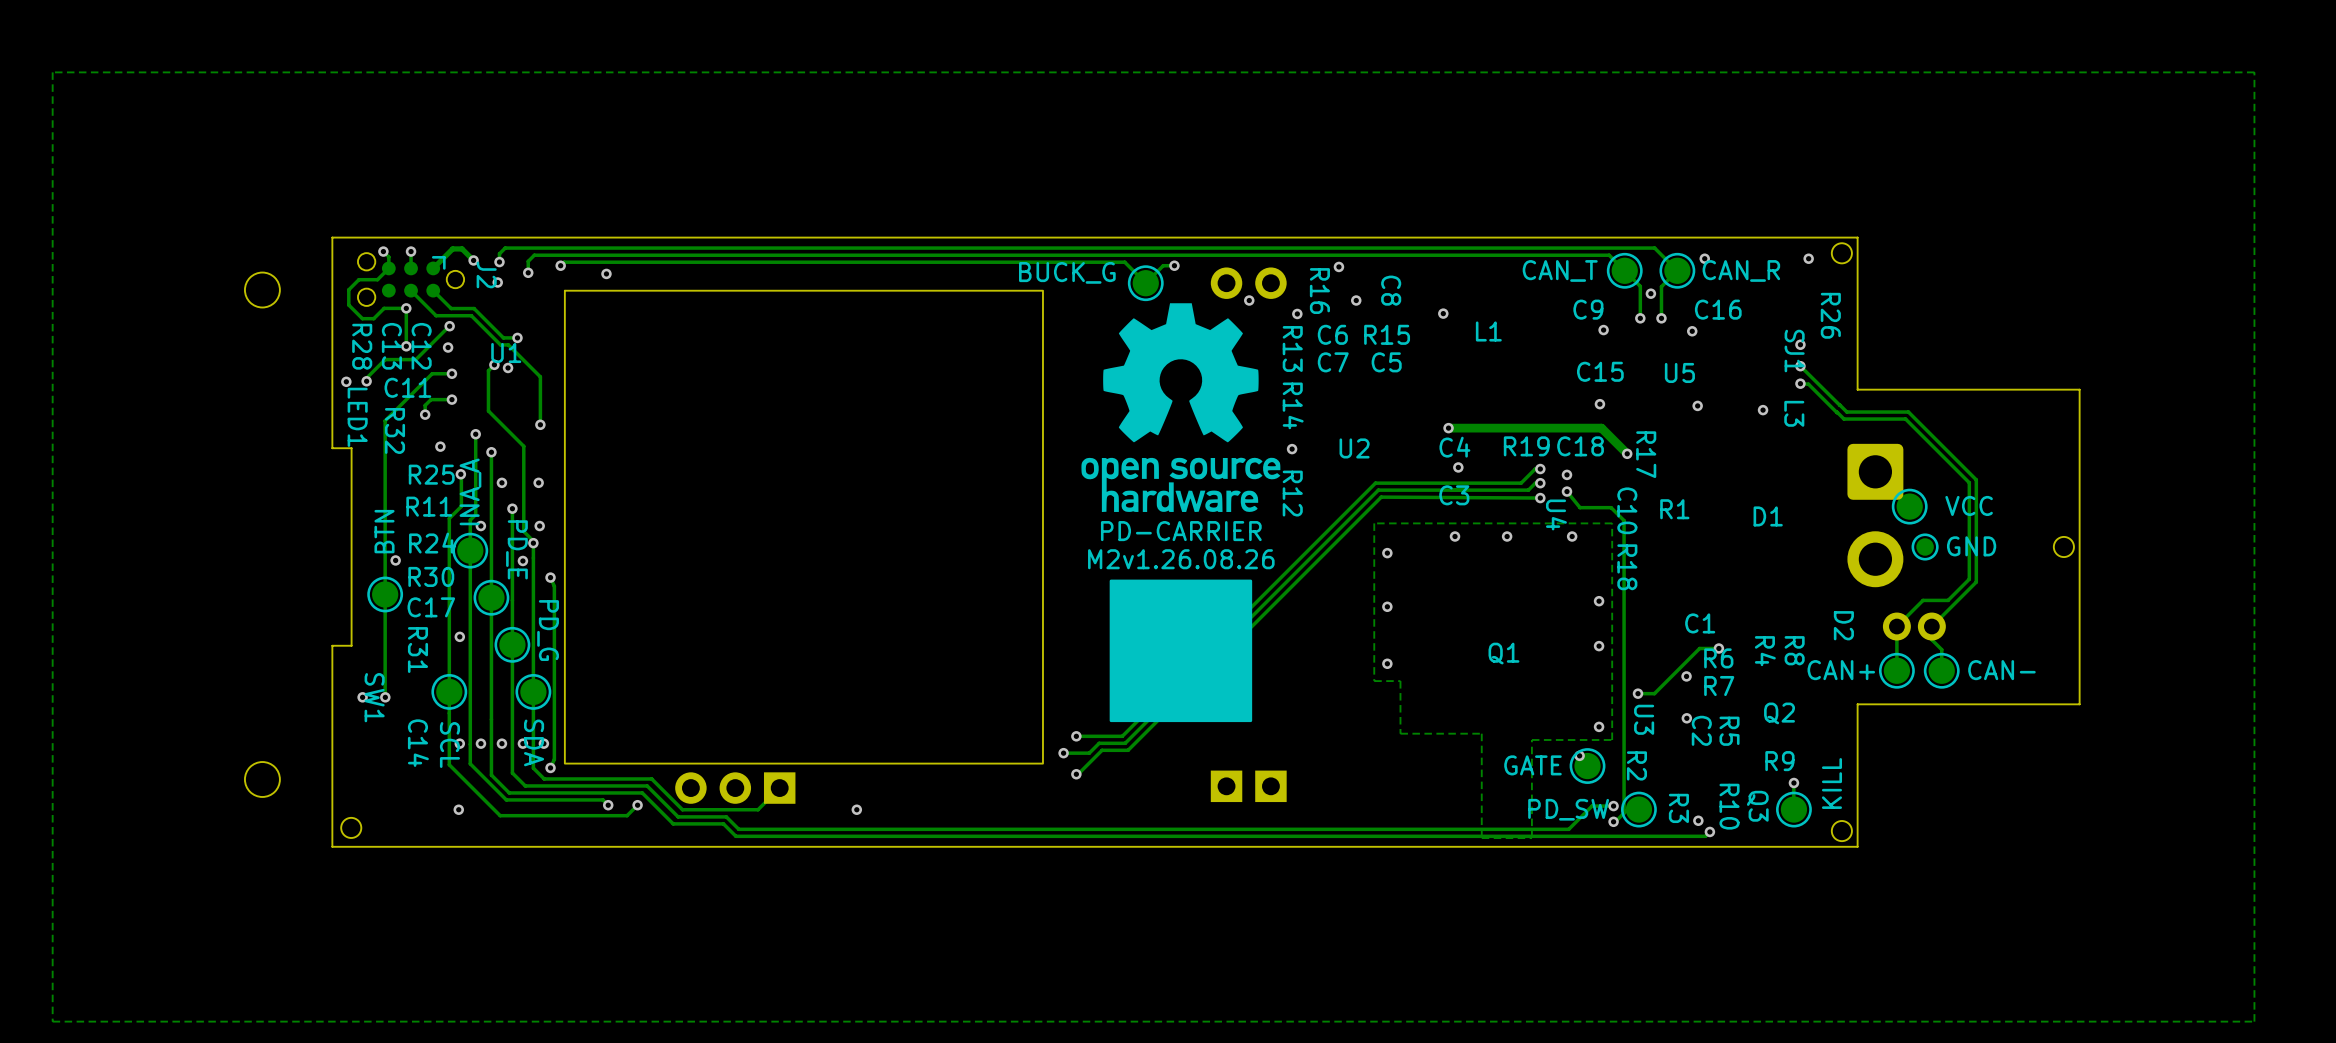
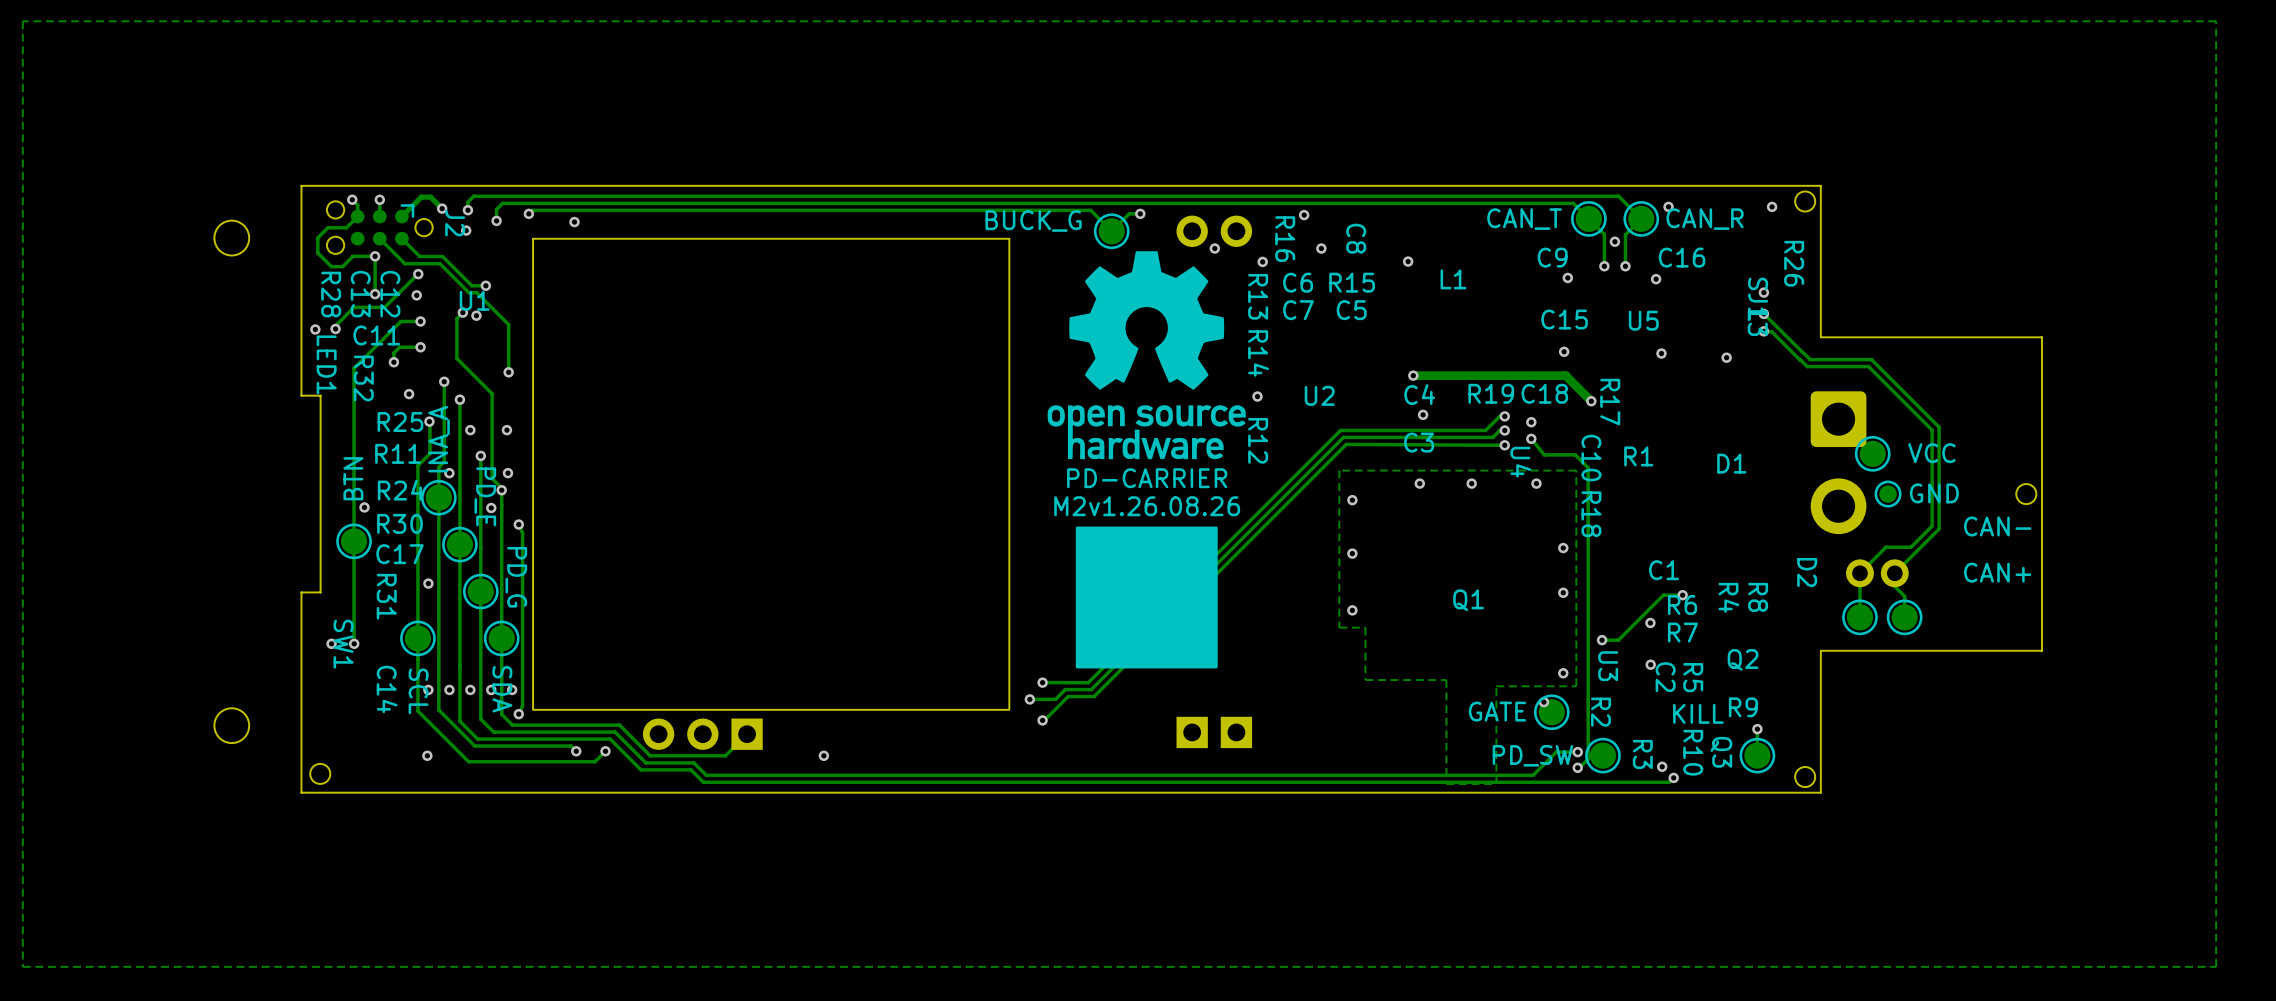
L3 position: (1794, 413) -> (1757, 323)
text position: CAN+ (1841, 670) -> CAN+ (1997, 572)
text position: CAN- (2001, 670) -> CAN- (1997, 526)
text rotation: 0° (1831, 783) -> 90° clockwise (1698, 713)
text position: KILL (1831, 783) -> KILL (1698, 713)

